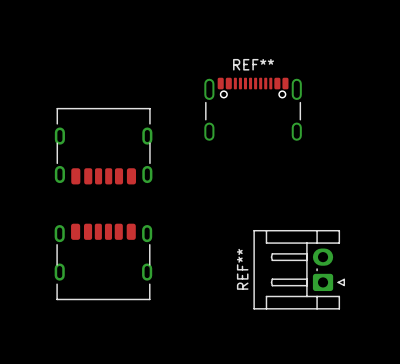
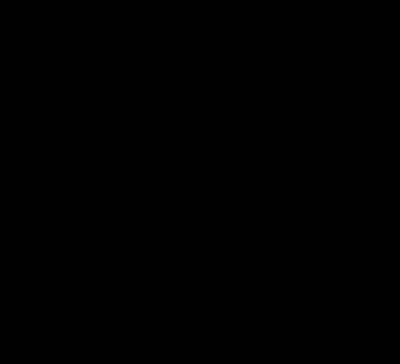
REF**: (253, 109) -> none
part: (103, 146) -> none
part: (103, 261) -> none
REF**: (299, 269) -> none

